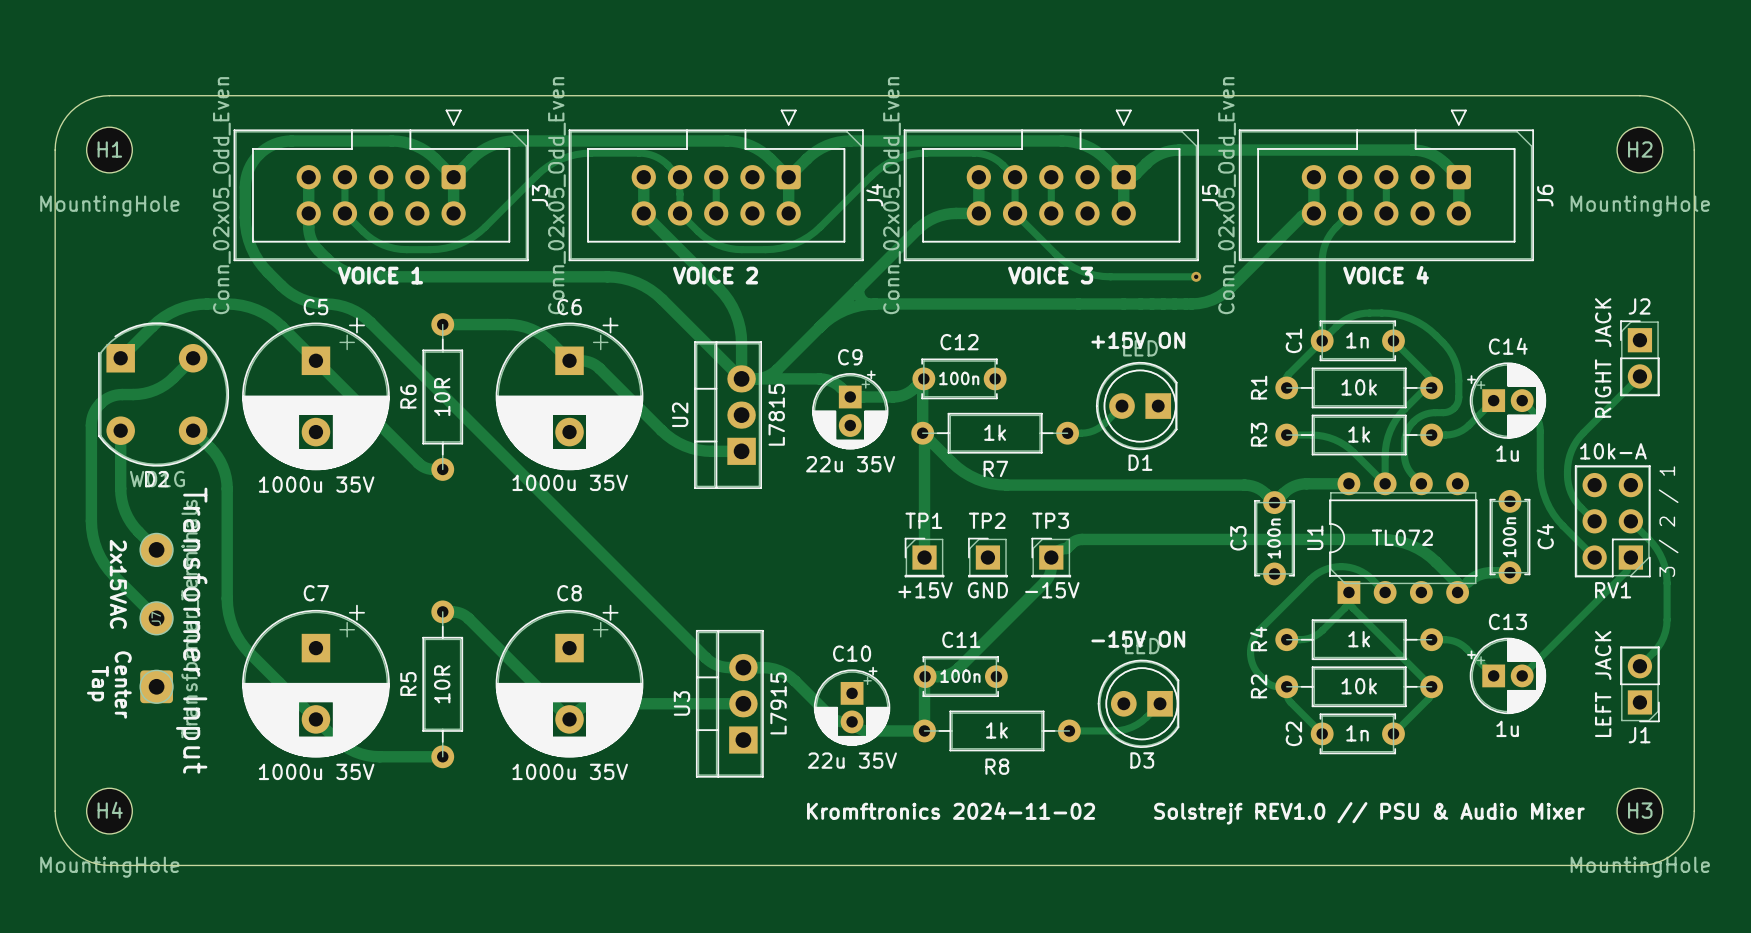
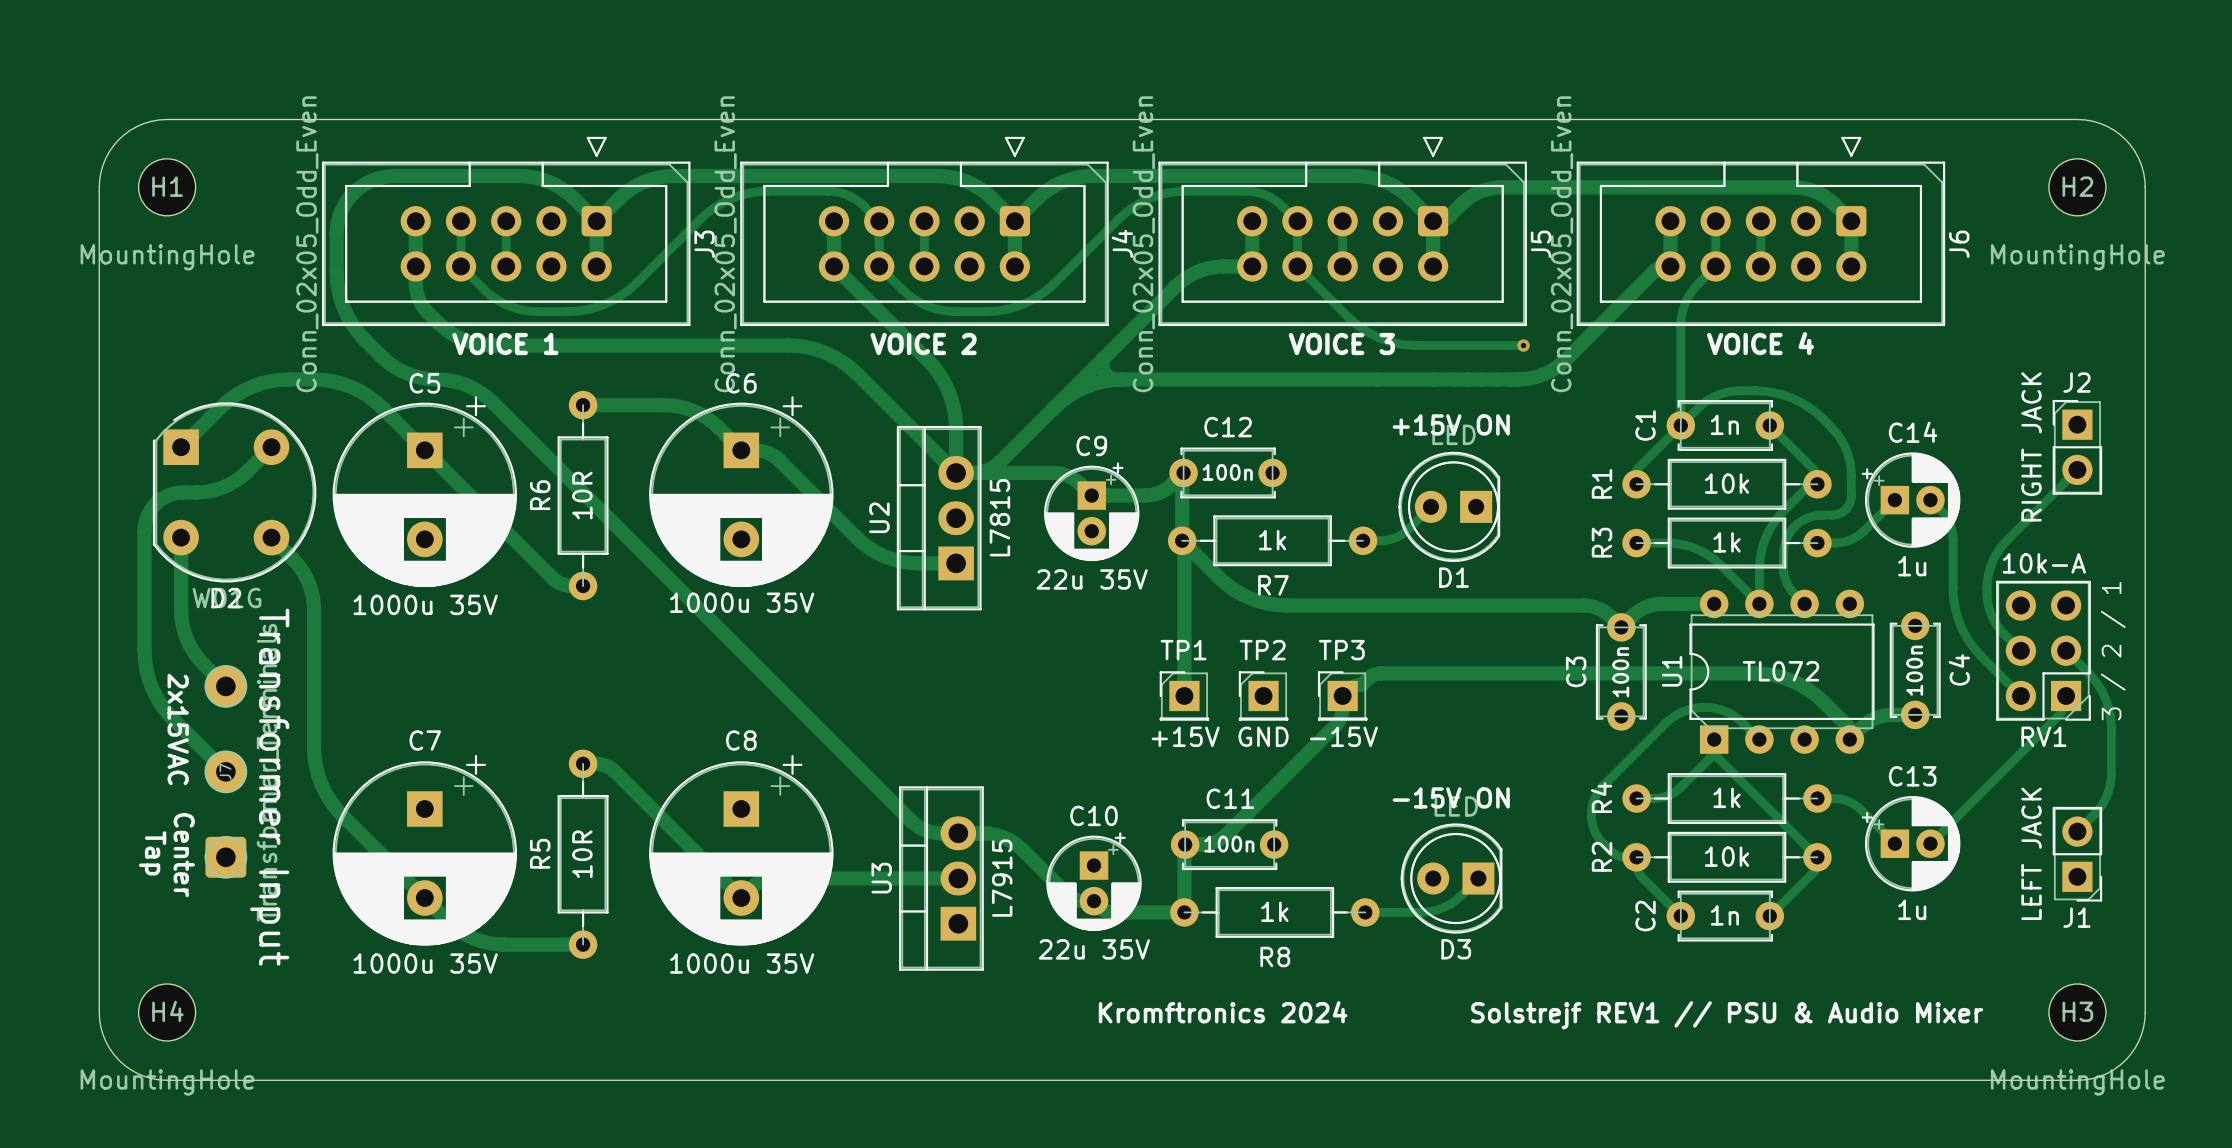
text: Kromftronics 2024-11-02 (951, 810) -> Kromftronics 2024 (1223, 1012)
text: Solstrejf REV1.0 // PSU & Audio Mixer (1369, 813) -> Solstrejf REV1 // PSU & Audio Mixer (1727, 1015)

